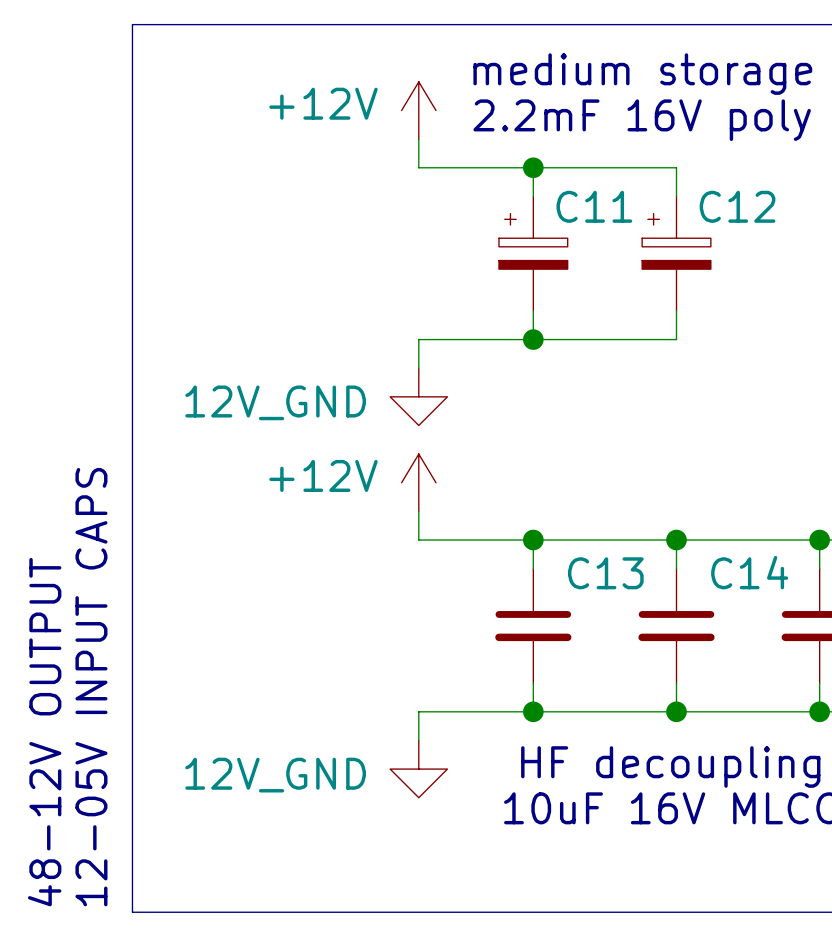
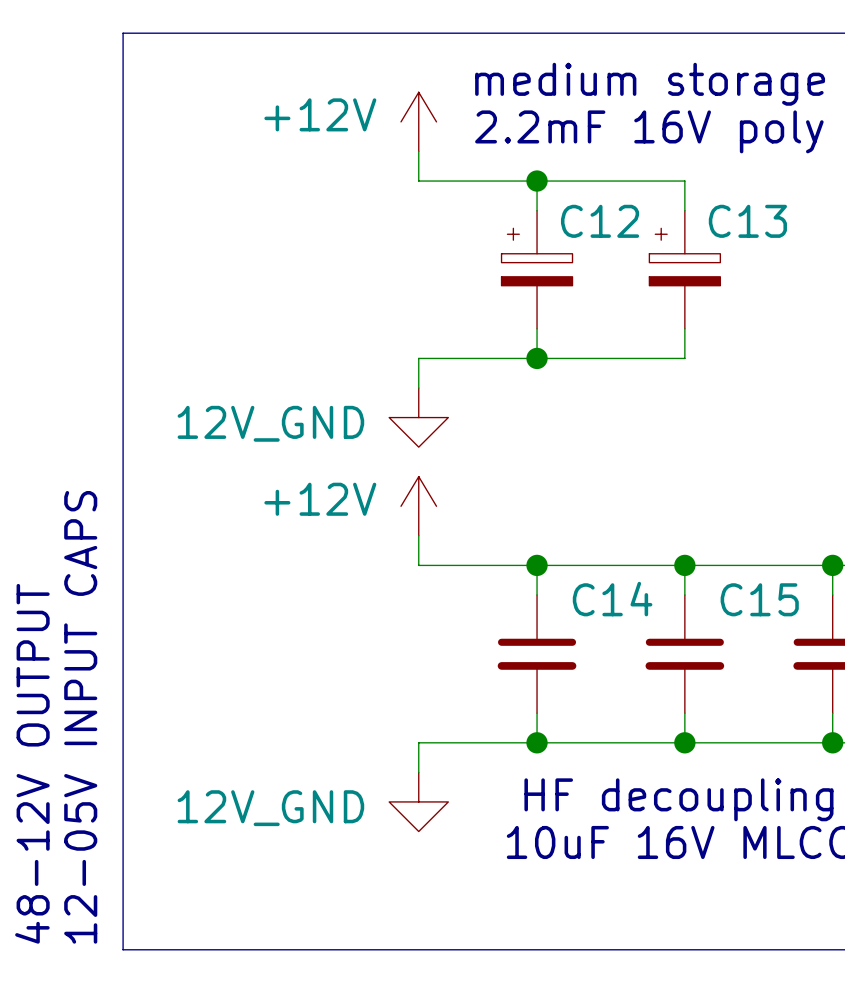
C11 name: C11 (594, 206) -> C12 (600, 221)
C12 name: C12 (737, 206) -> C13 (747, 221)
C14 name: C14 (749, 572) -> C15 (759, 599)
C13 name: C13 (605, 573) -> C14 (612, 599)

